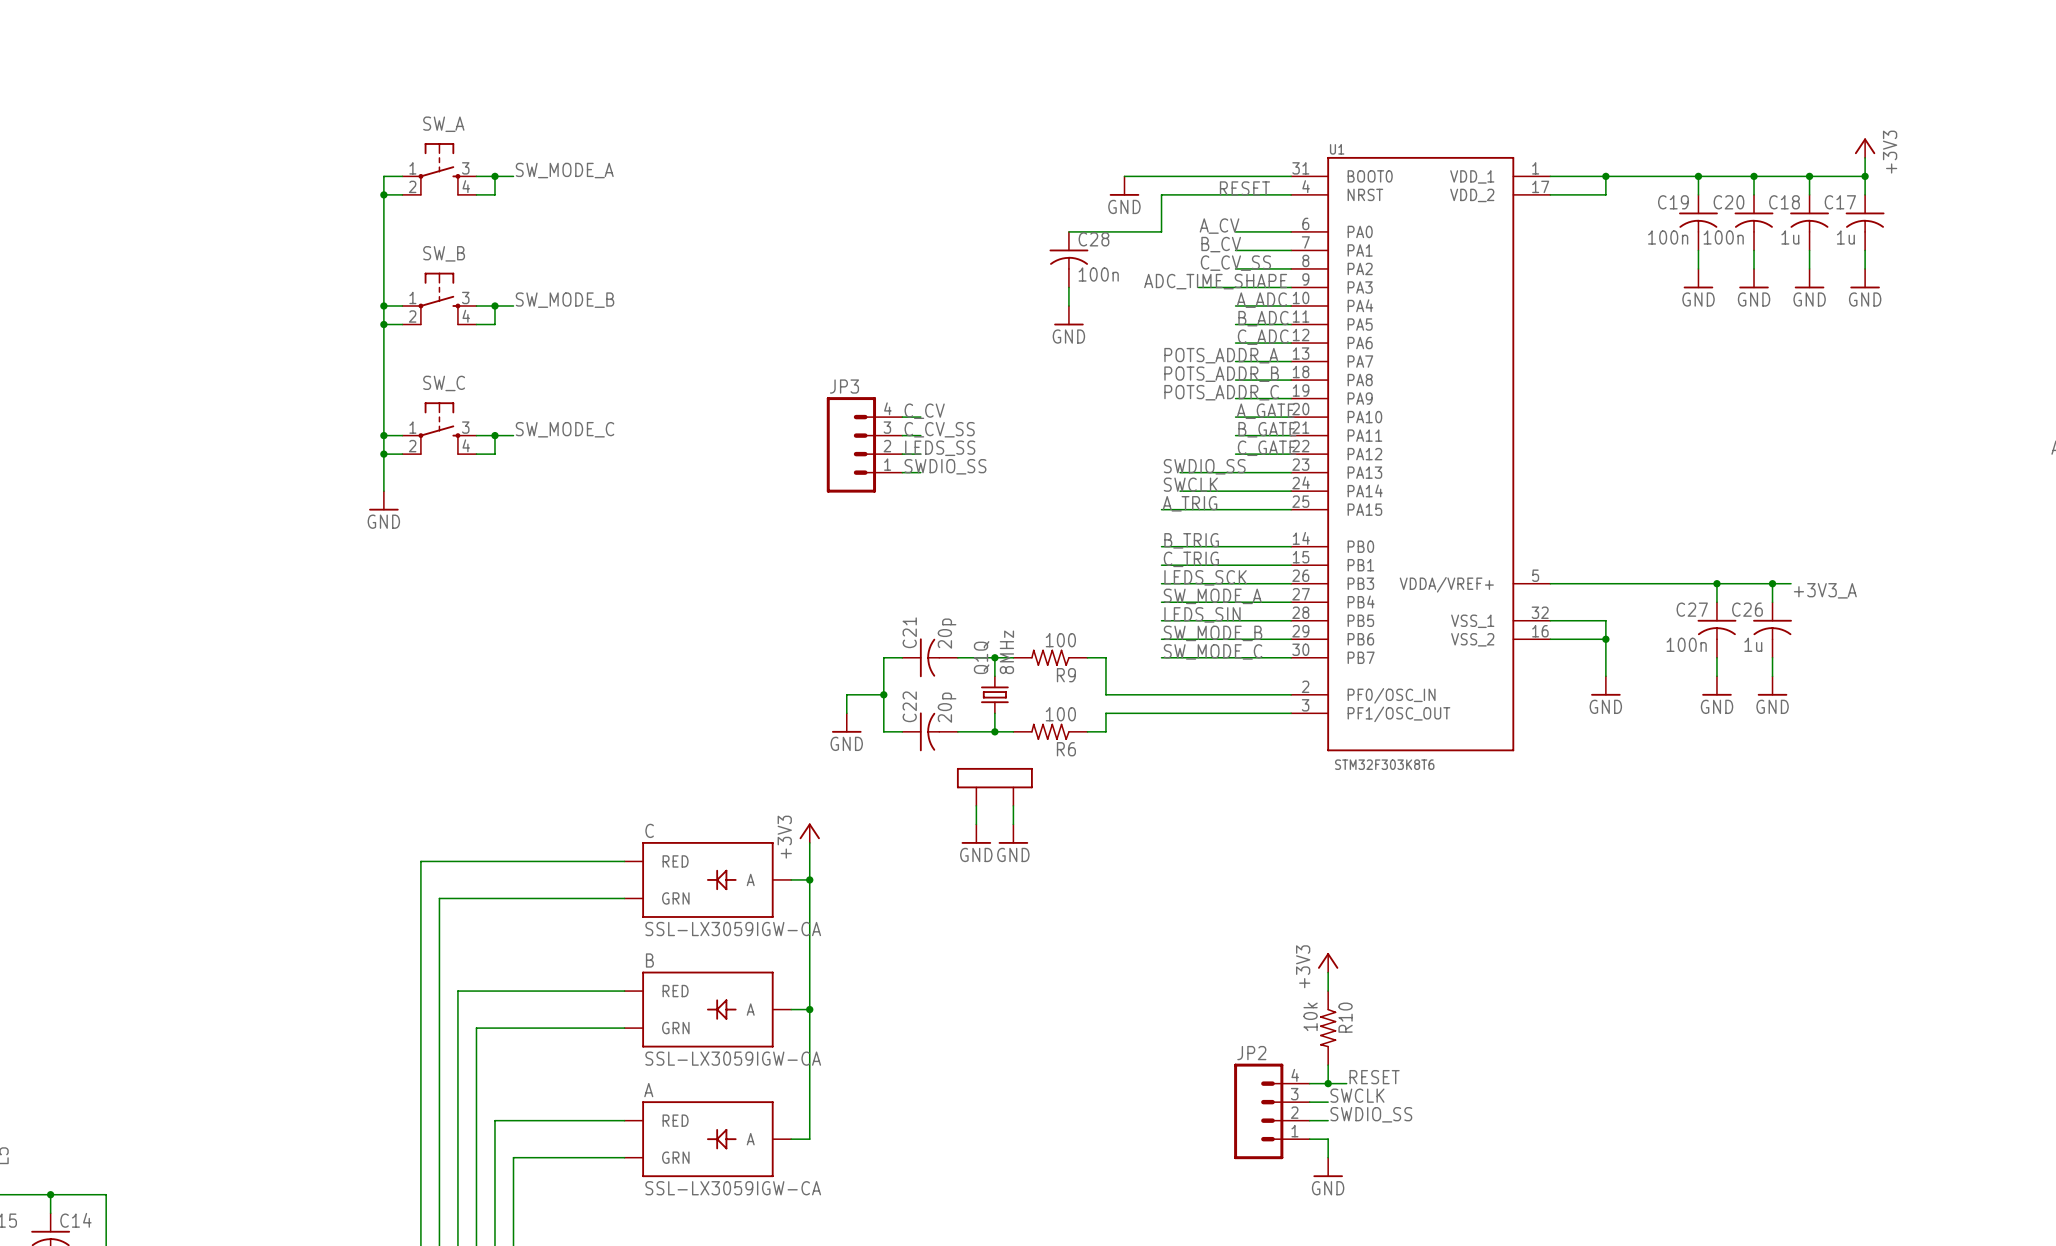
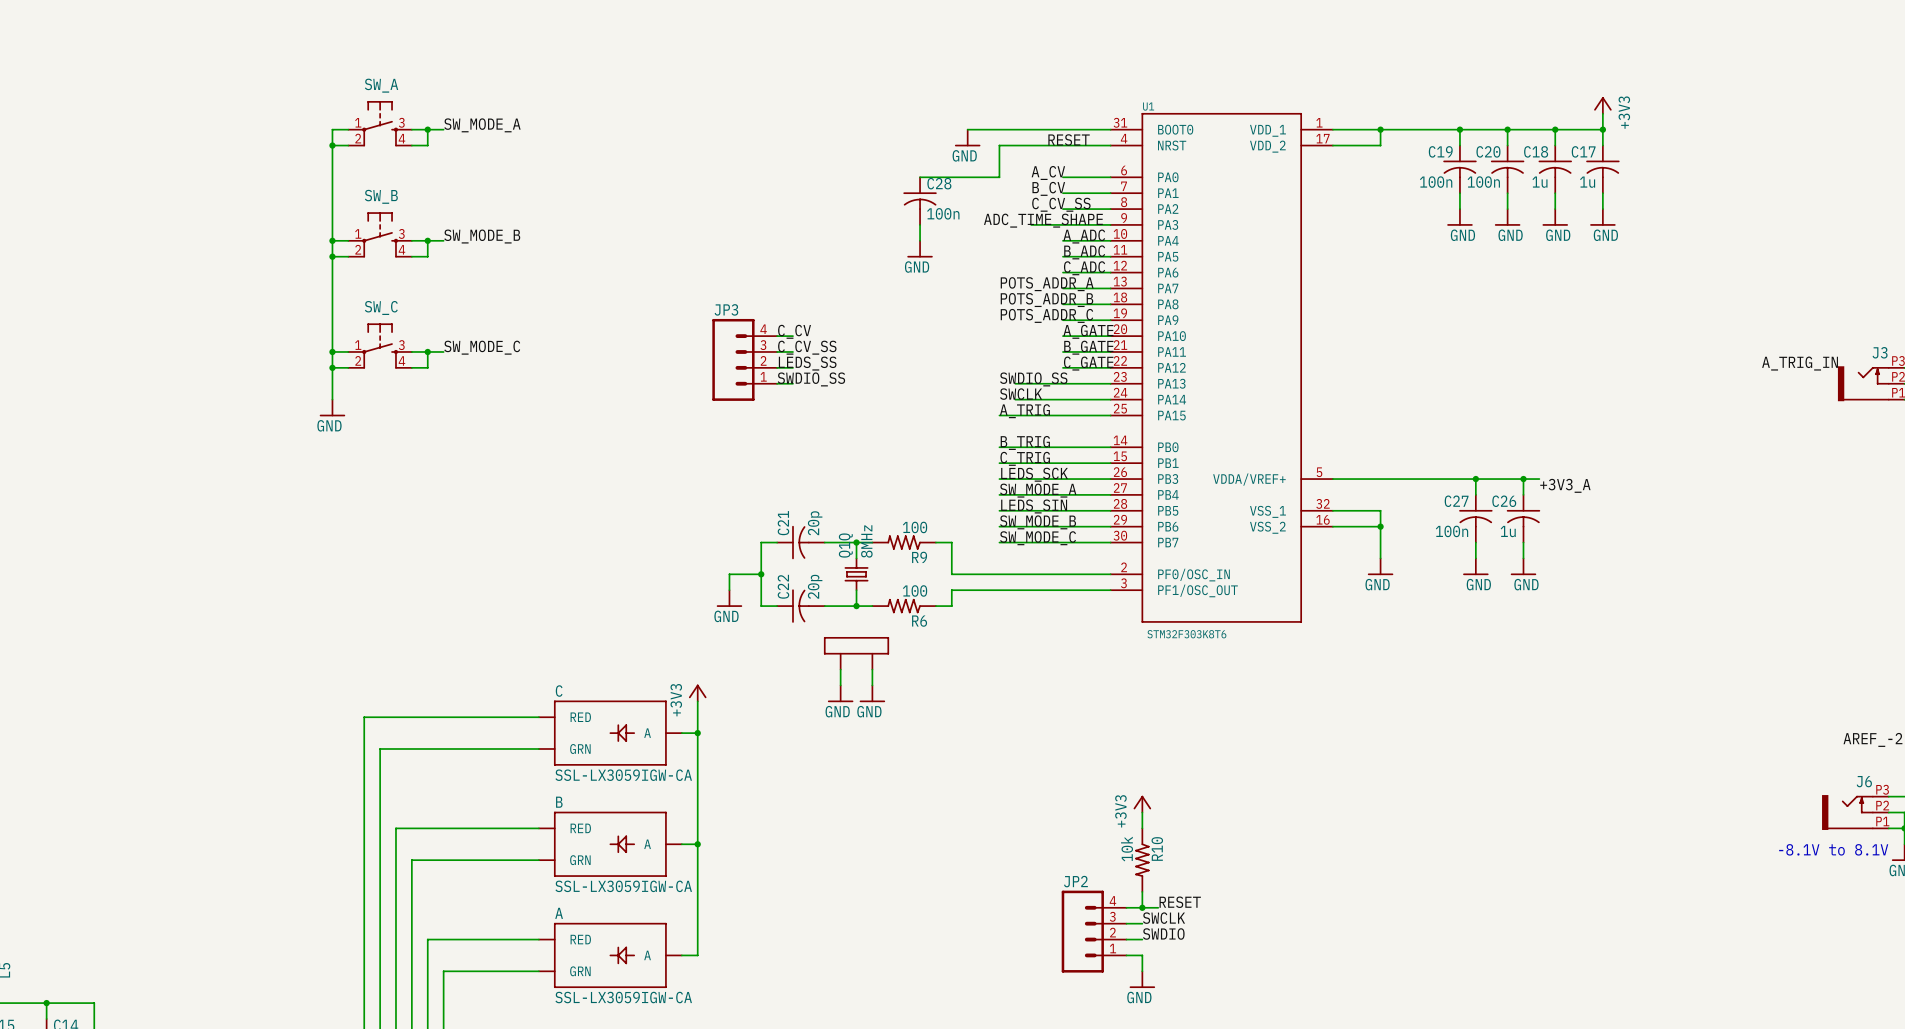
label: SWDIO_SS (1371, 1114) -> SWDIO (1163, 934)

